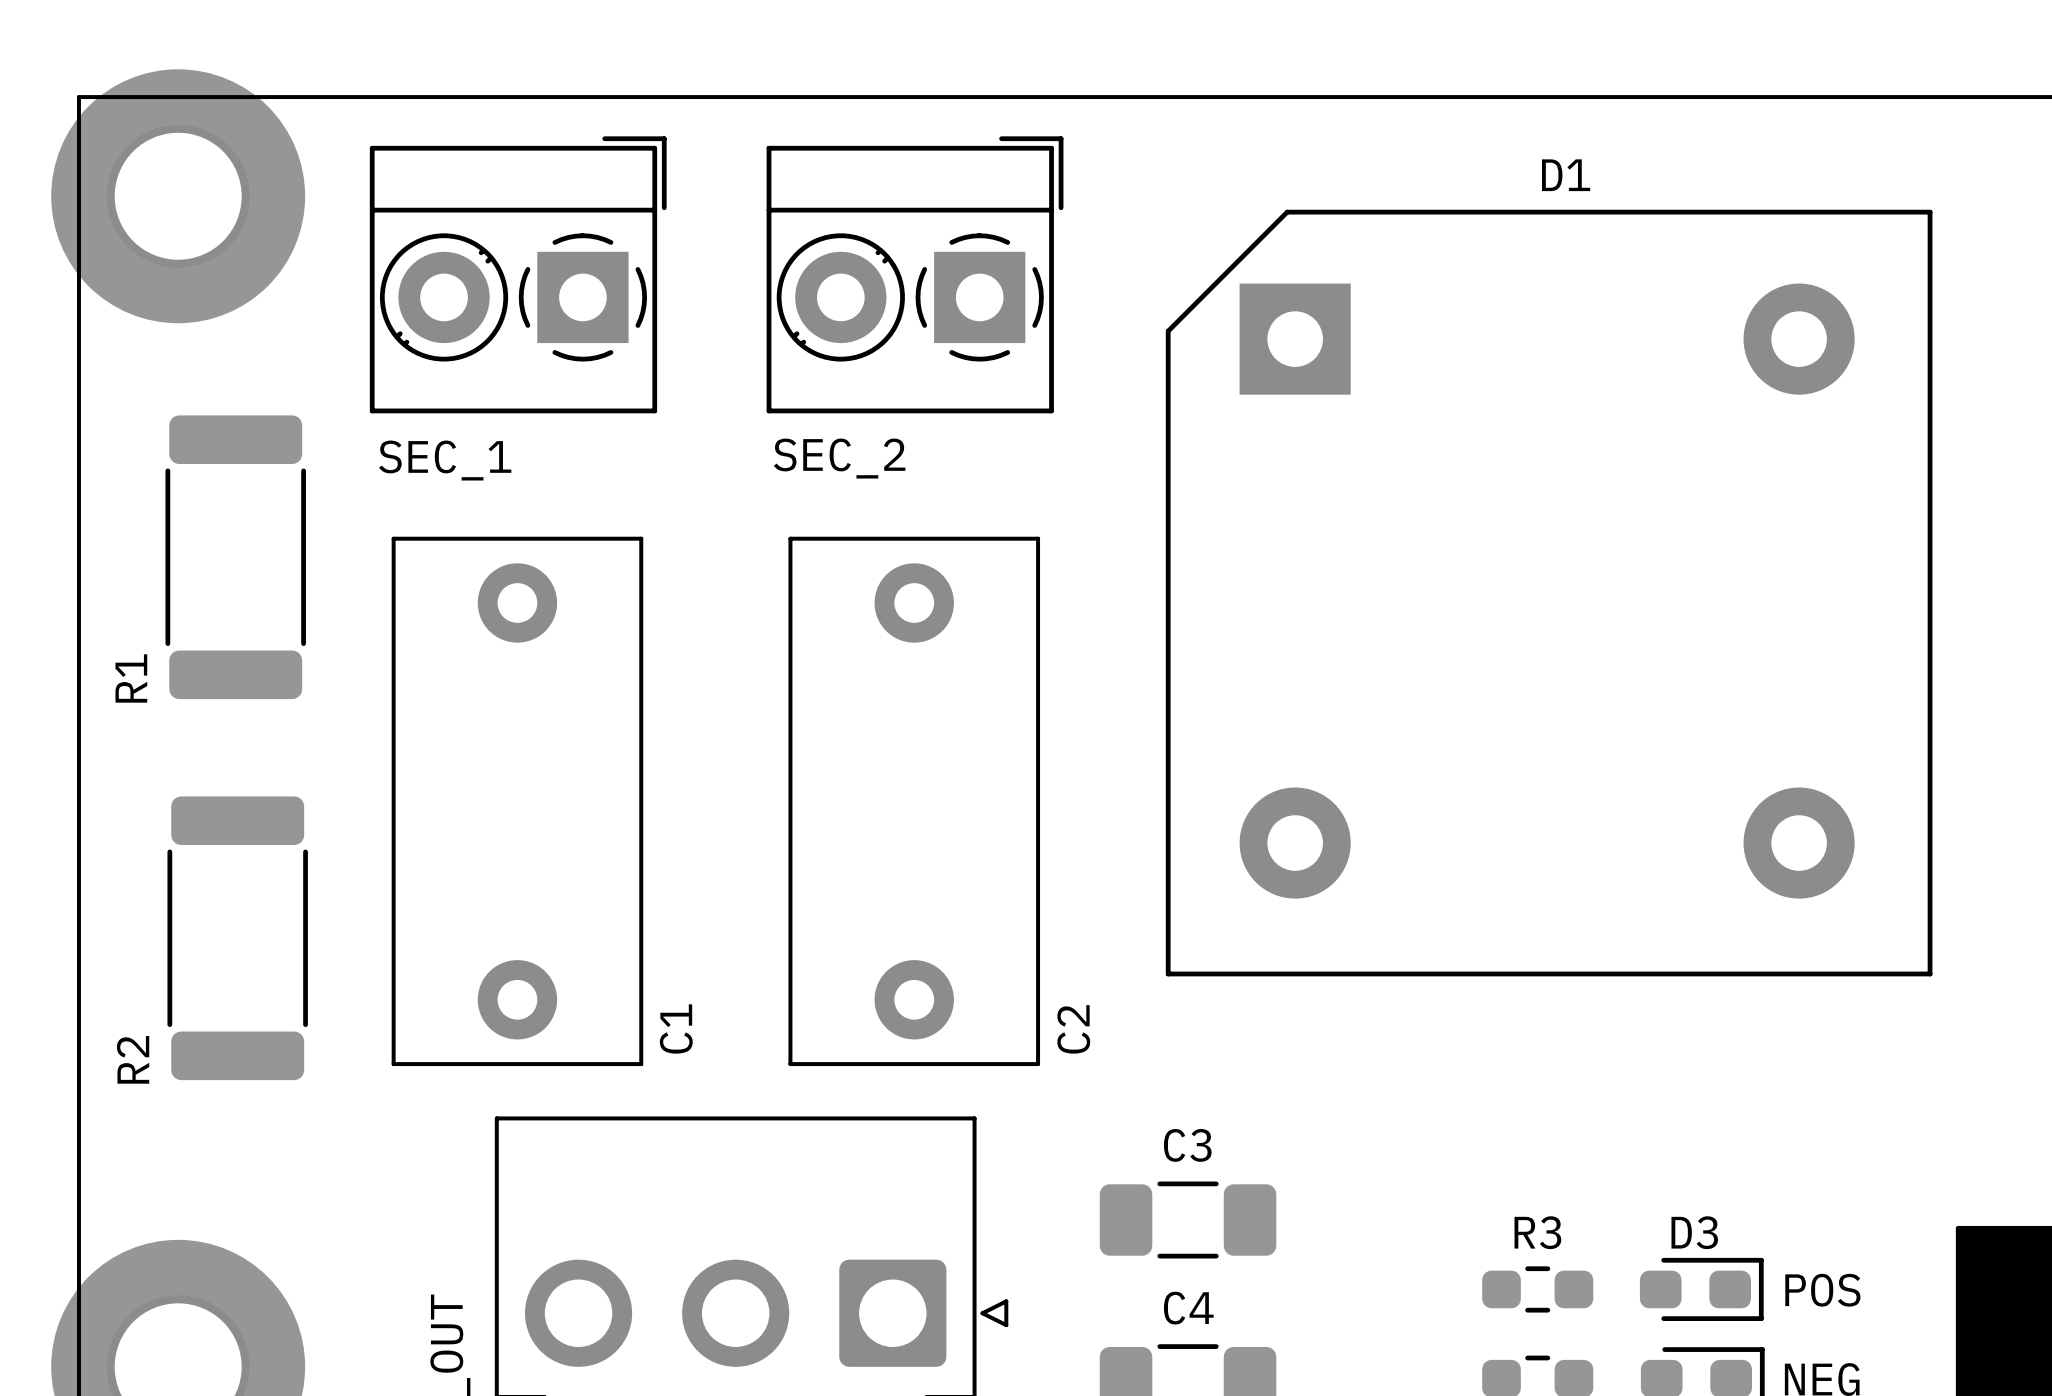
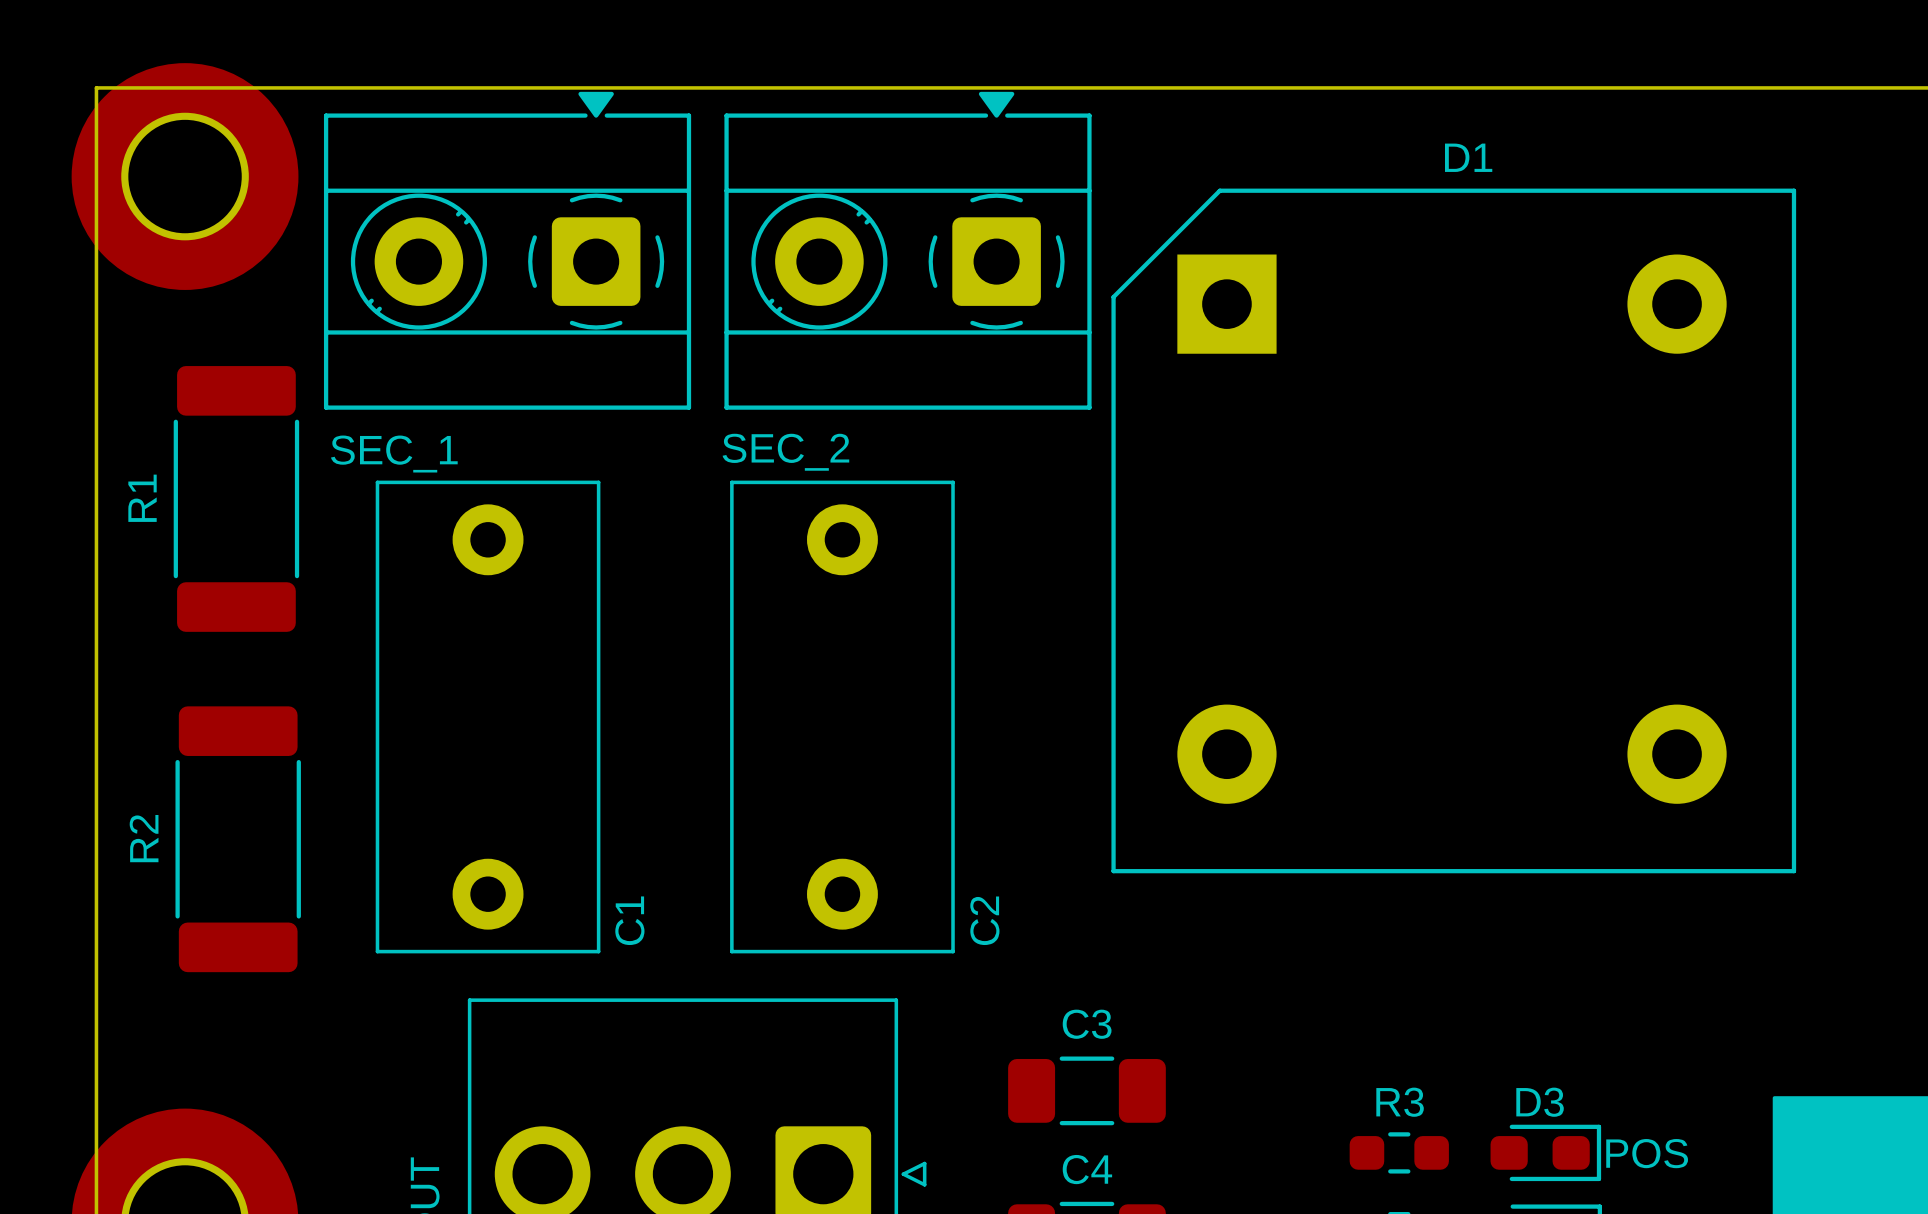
part footprint: [369, 136, 667, 414] -> [323, 91, 692, 410]
part: (915, 274) -> none
part: none -> (908, 250)
R1 footprint: [165, 415, 306, 700] -> [173, 366, 300, 632]
text position: SEC_2 (839, 458) -> SEC_2 (785, 452)
text position: SEC_1 (445, 460) -> SEC_1 (394, 454)
D1 position: (1549, 593) -> (1453, 530)
R1 name position: R1 (131, 678) -> R1 (142, 498)
R2 footprint: [167, 796, 308, 1081] -> [175, 706, 301, 973]
R2 name position: R2 (133, 1059) -> R2 (144, 838)

